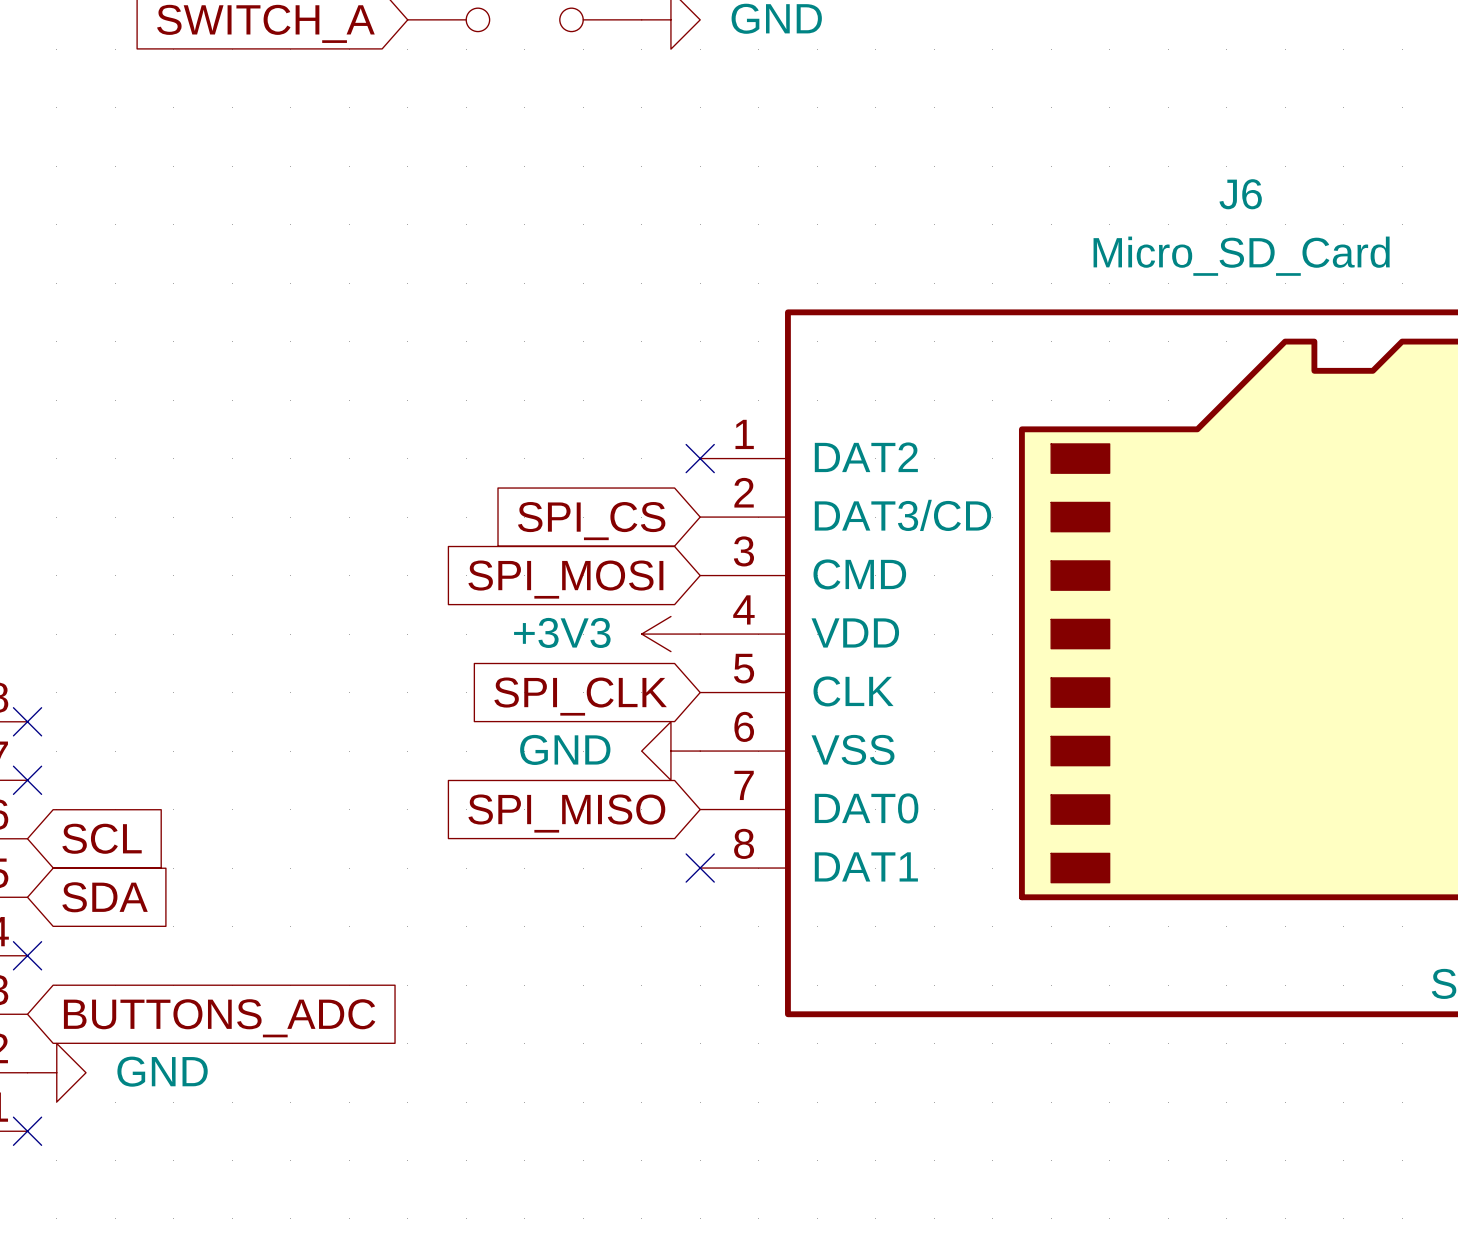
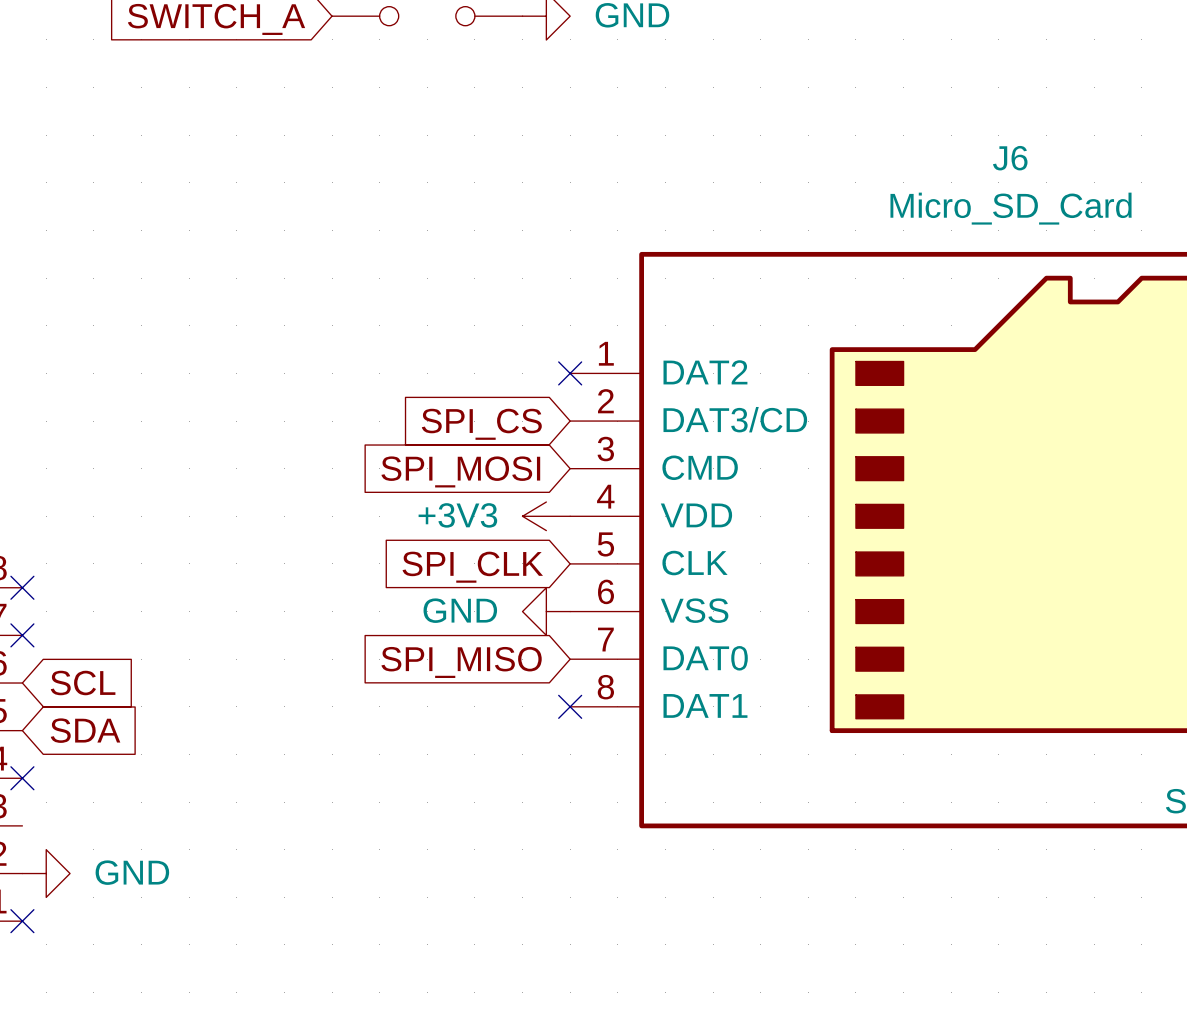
global label: BUTTONS_ADC (219, 1018) -> none

